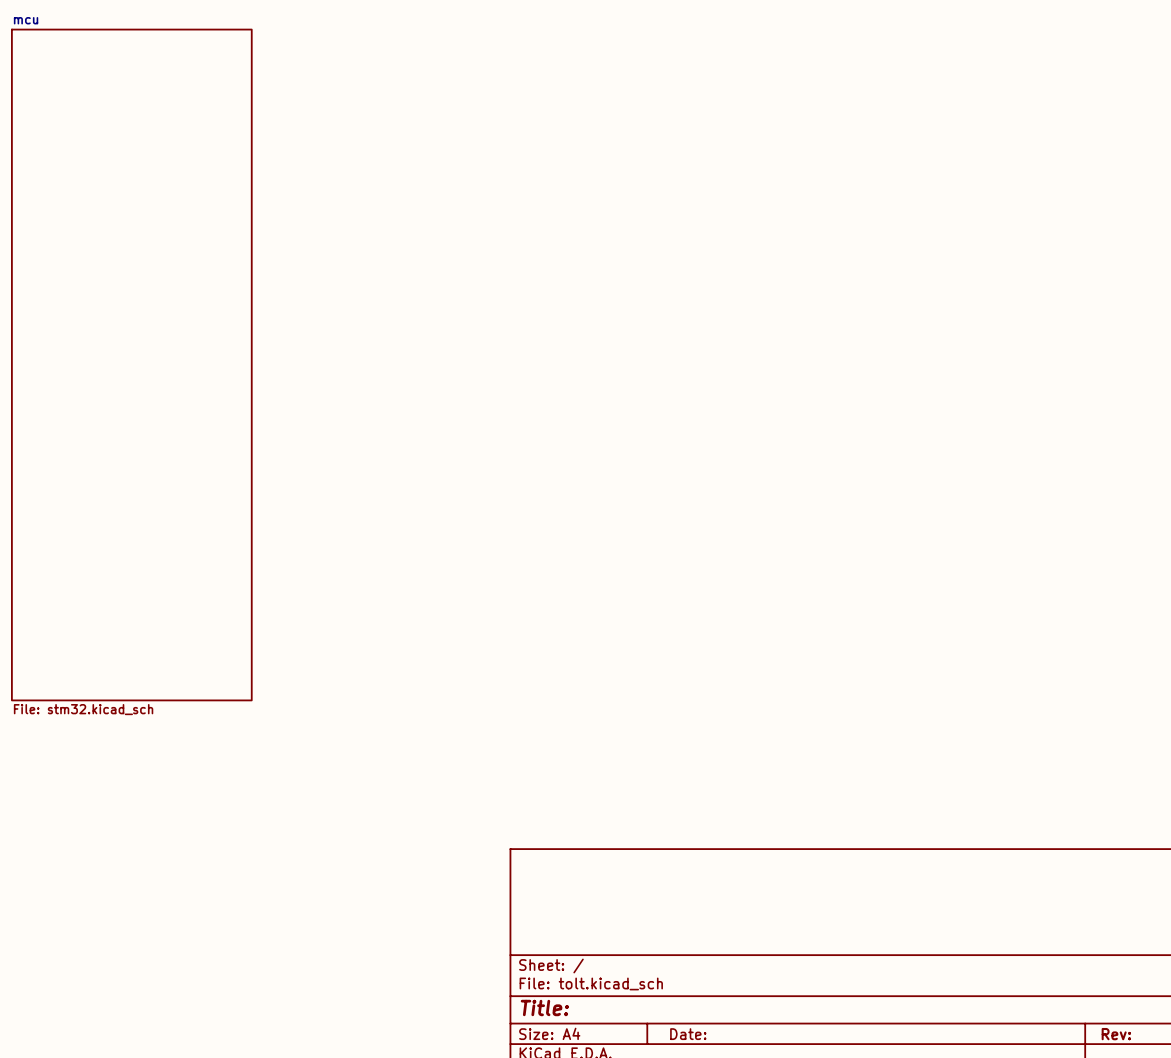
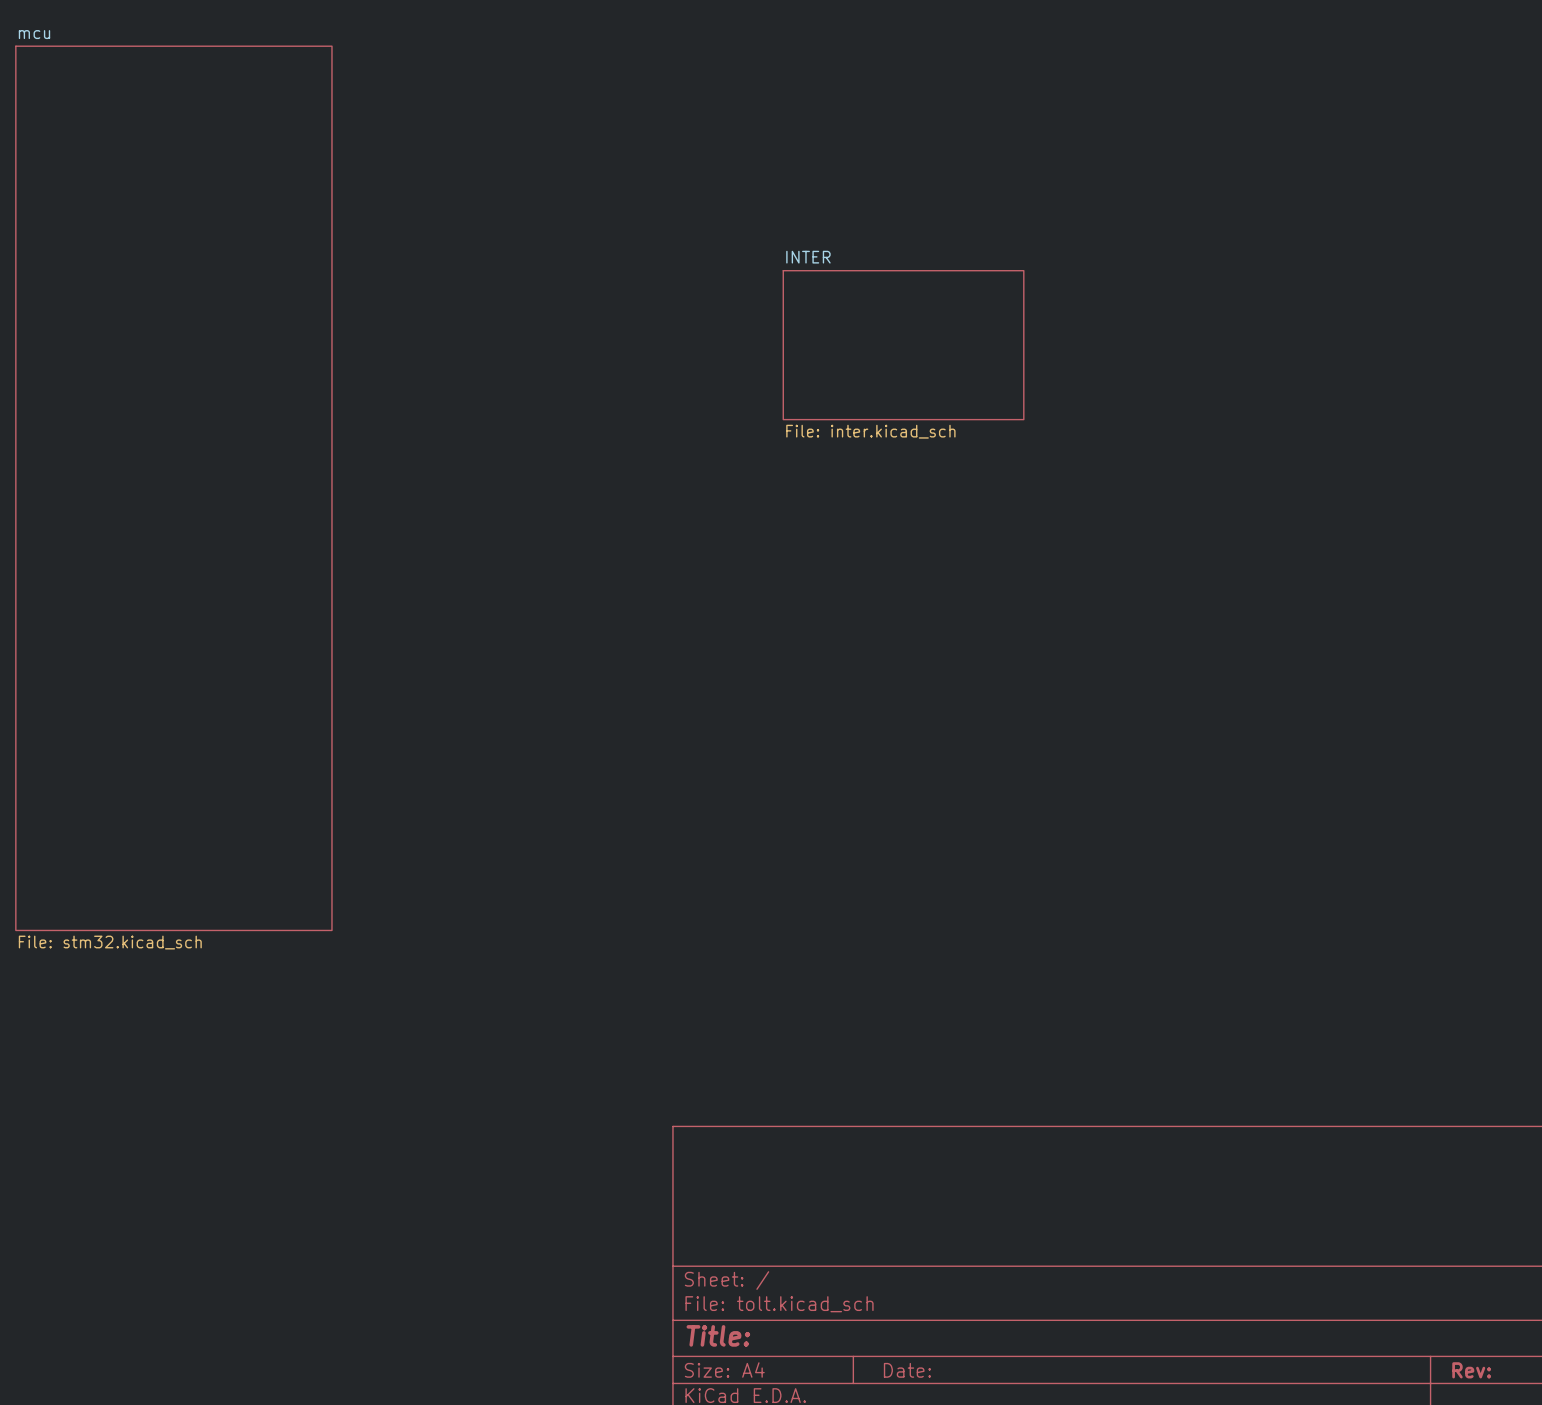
sheet INTER: none -> File: inter.kicad_sch (903, 345)

